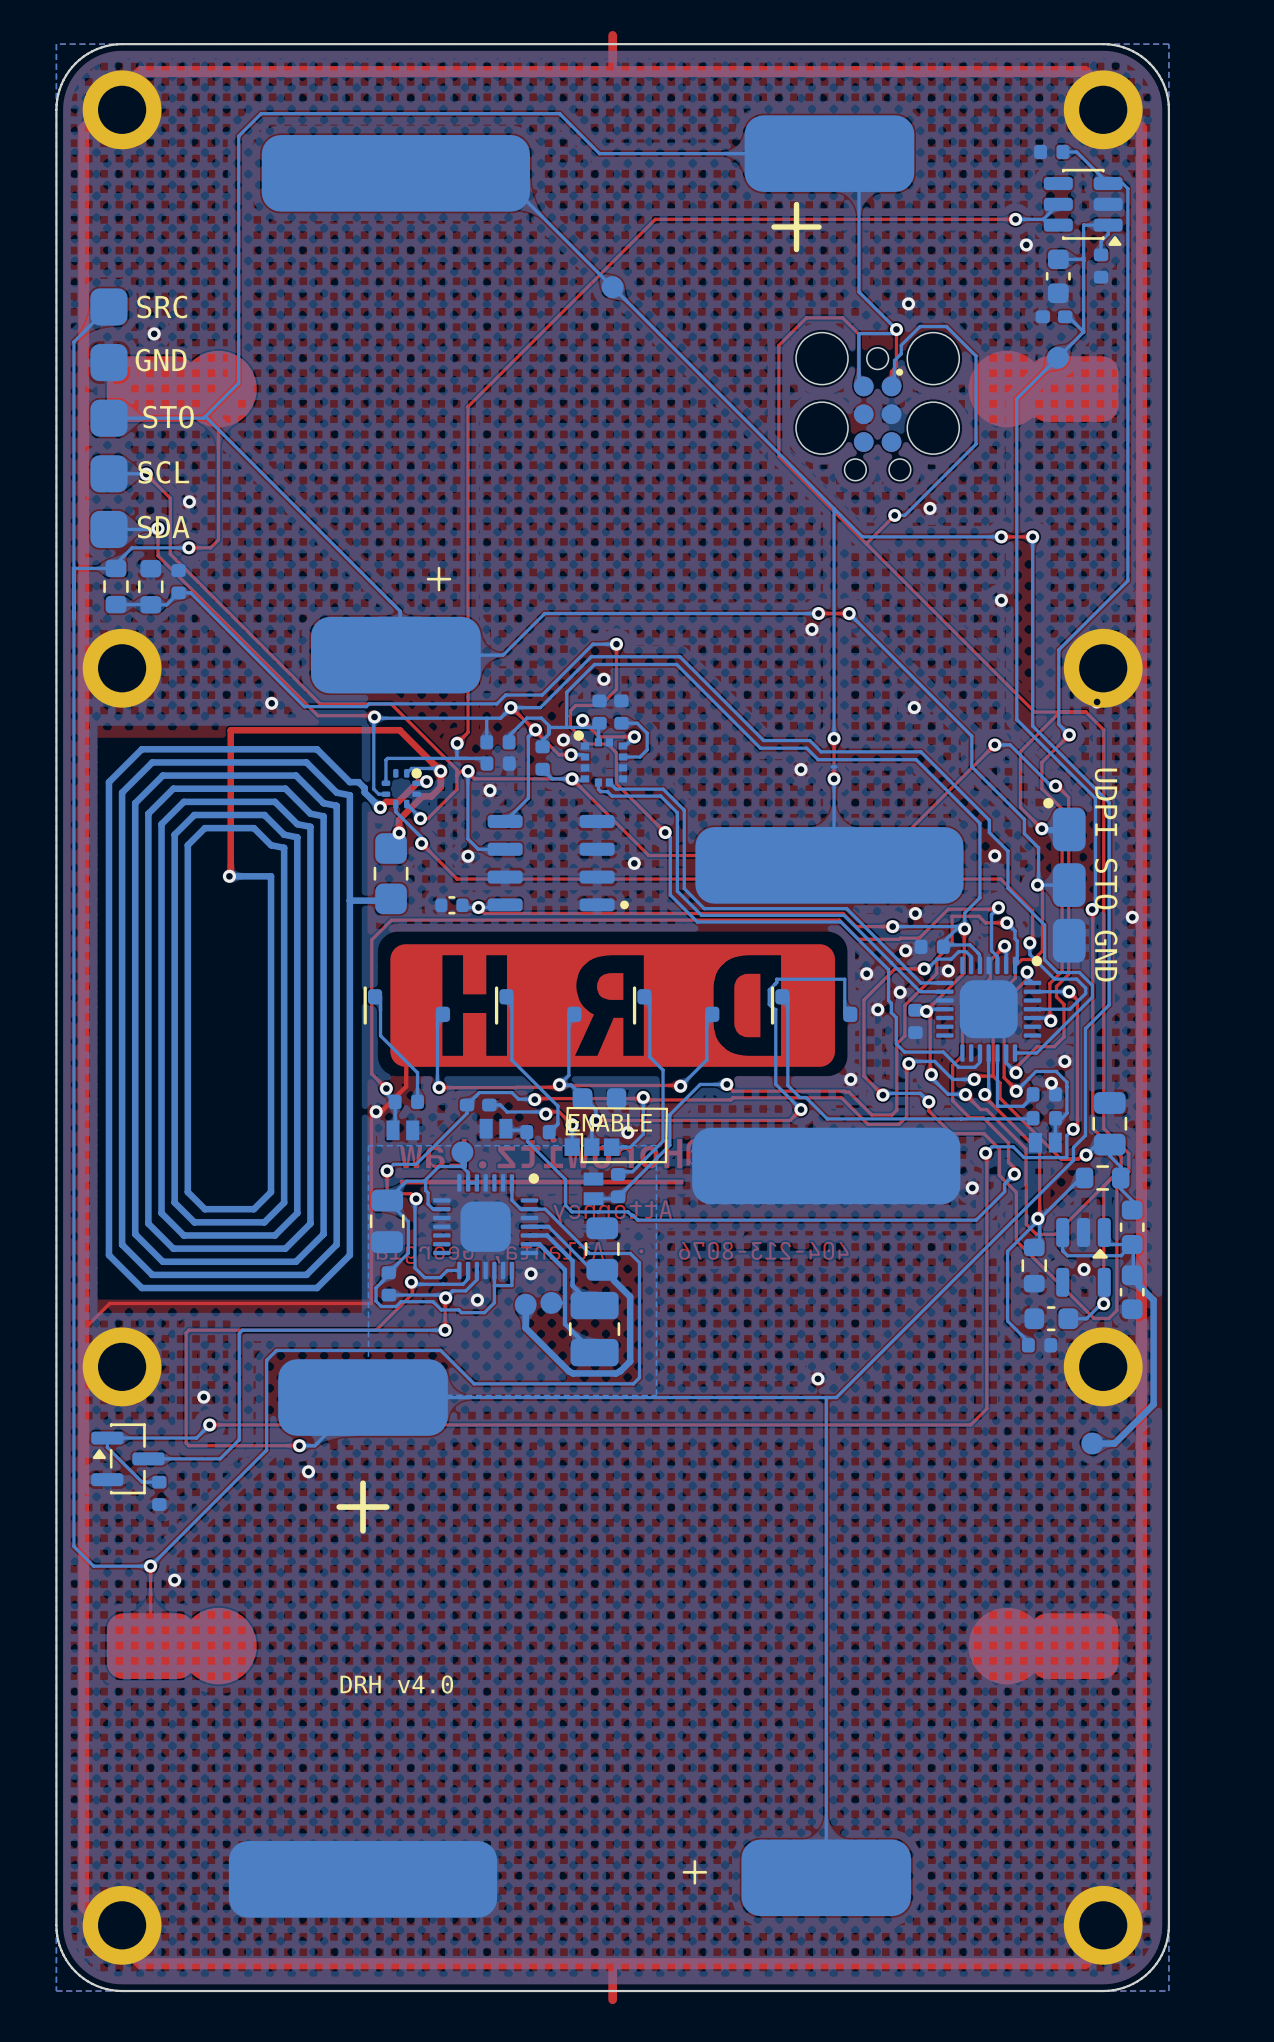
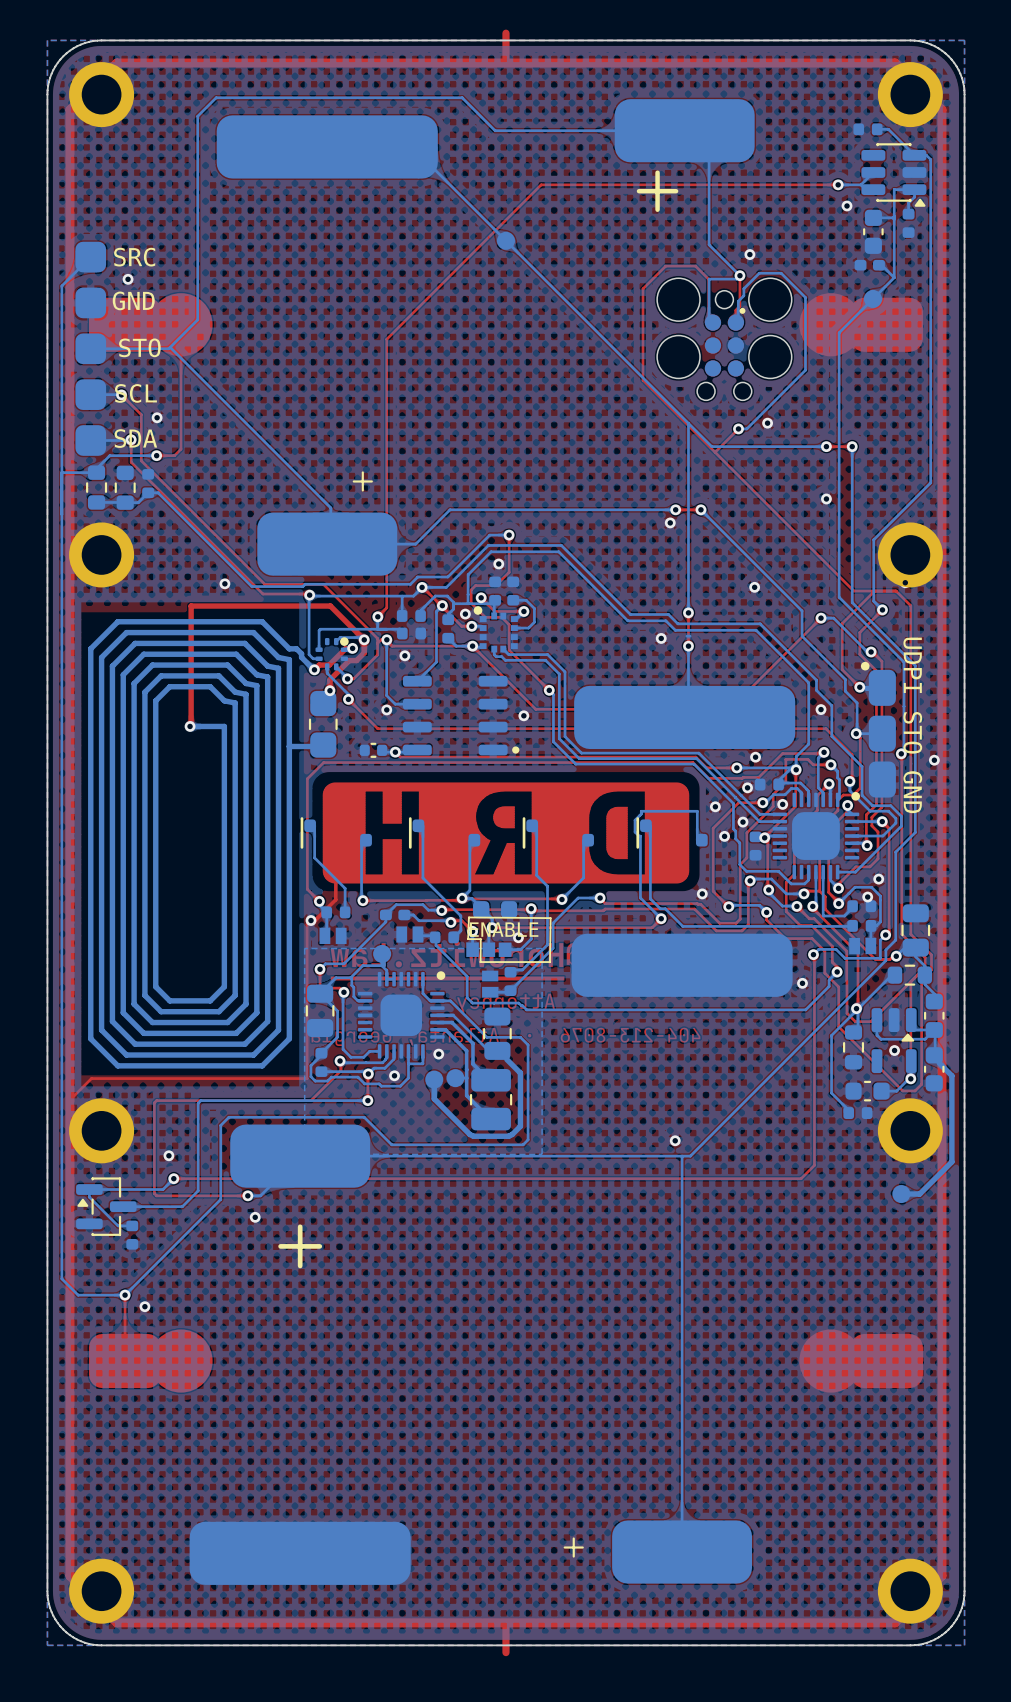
text: DRH v4.0 (396, 1684) -> none

